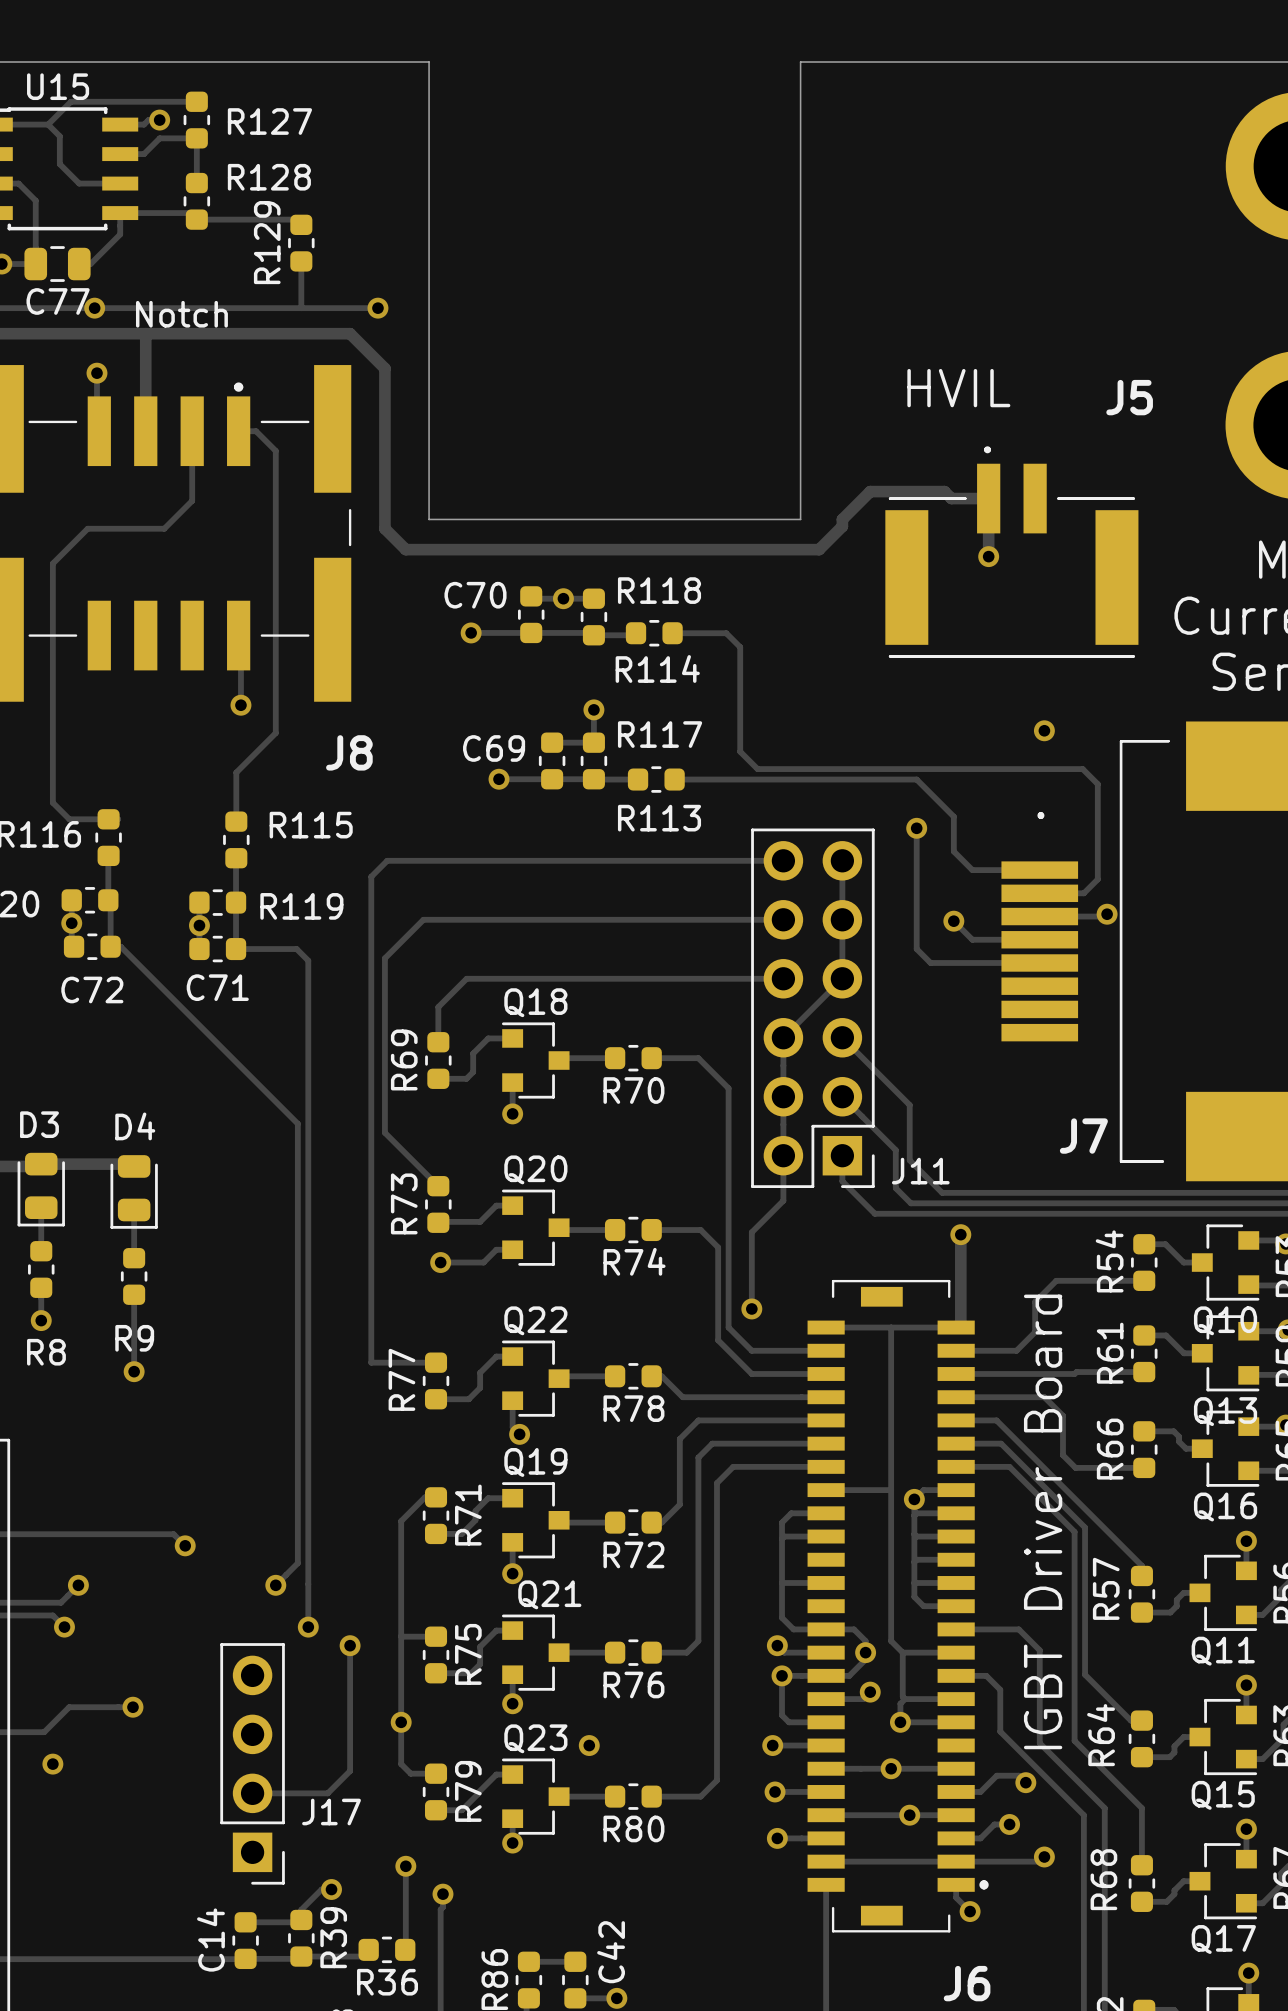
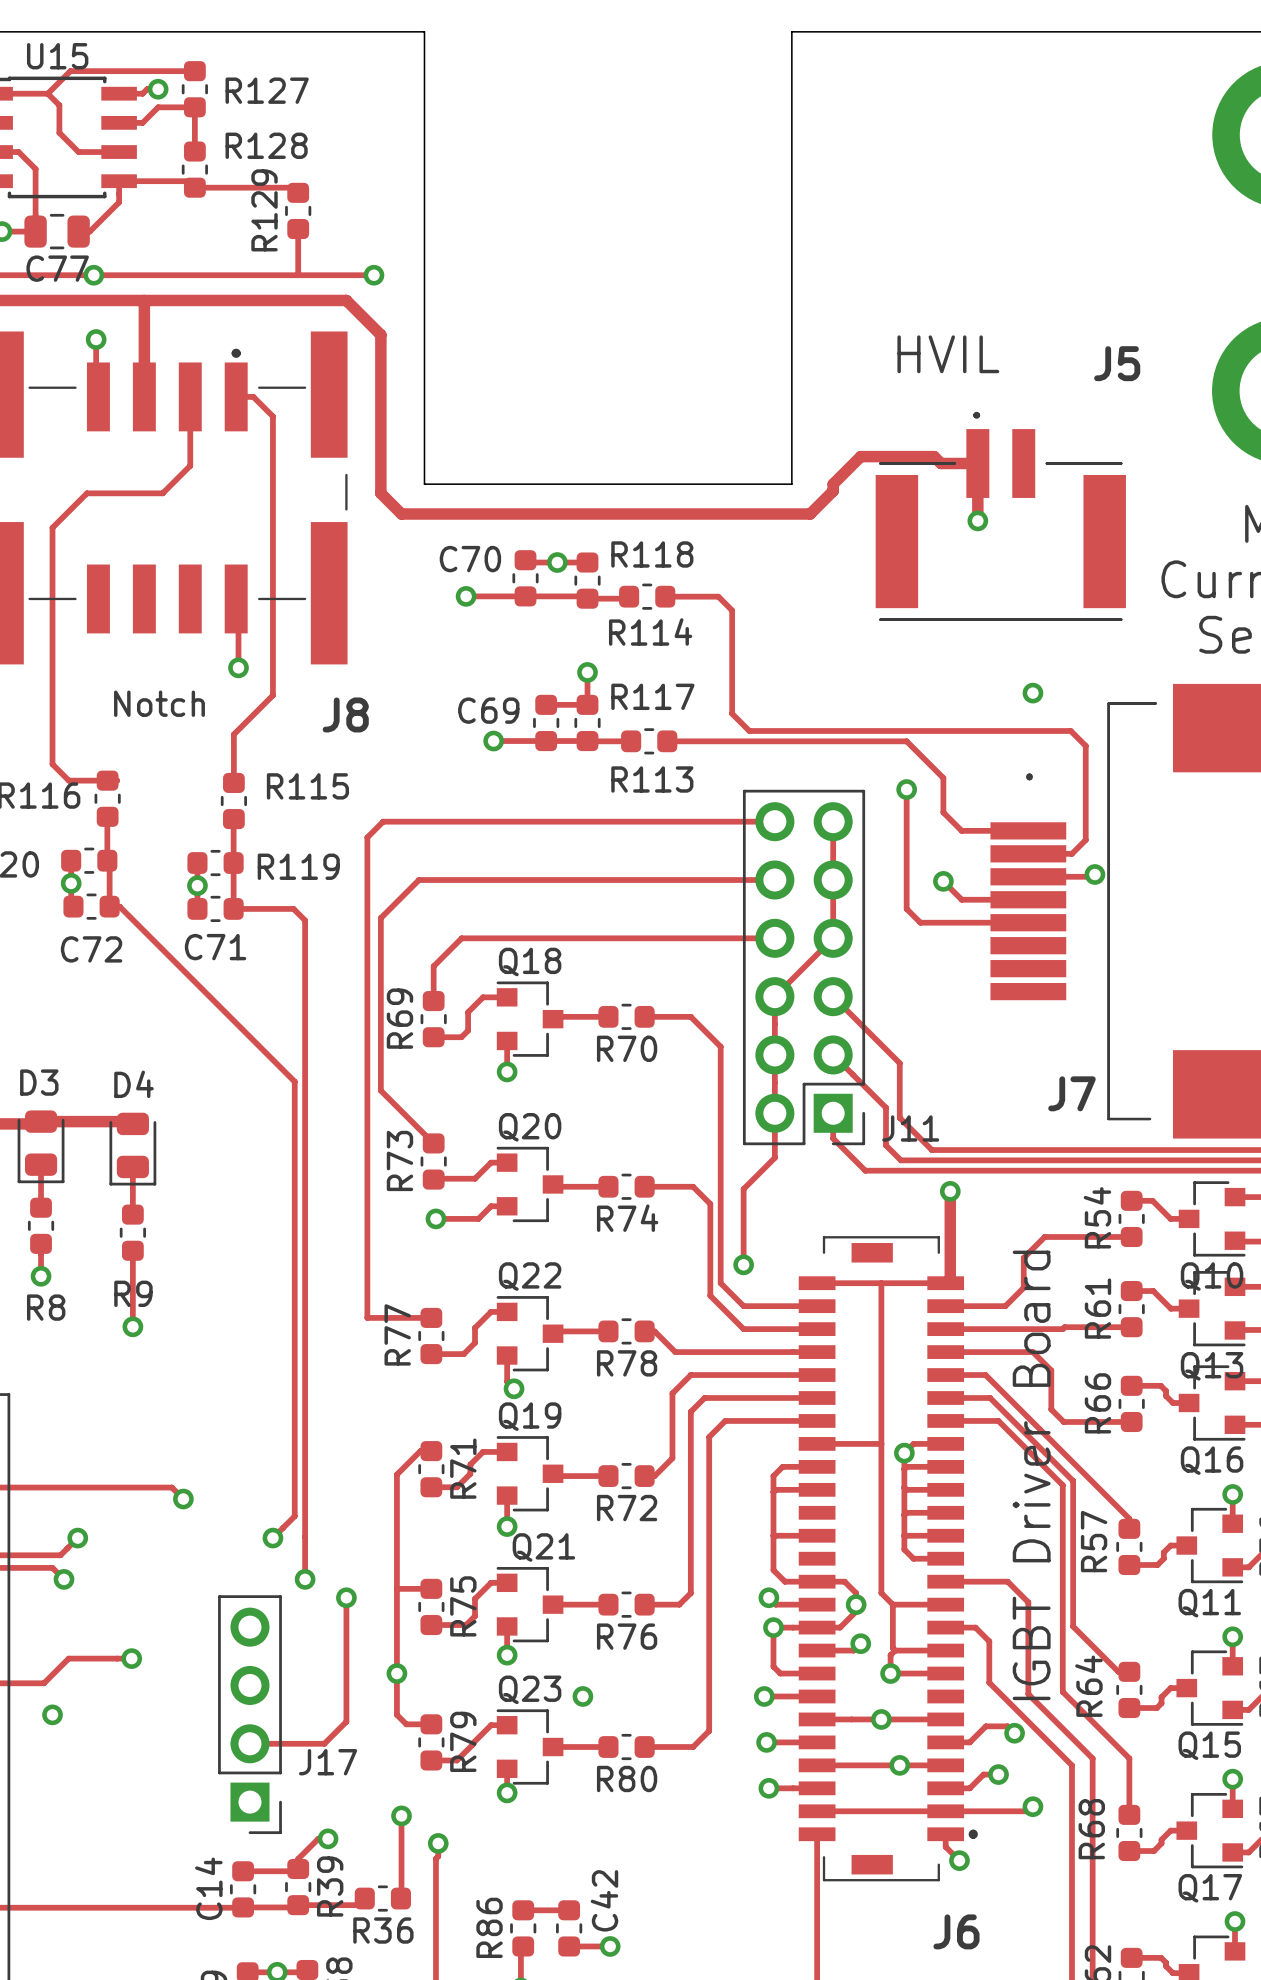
text position: Notch (181, 314) -> Notch (159, 703)

